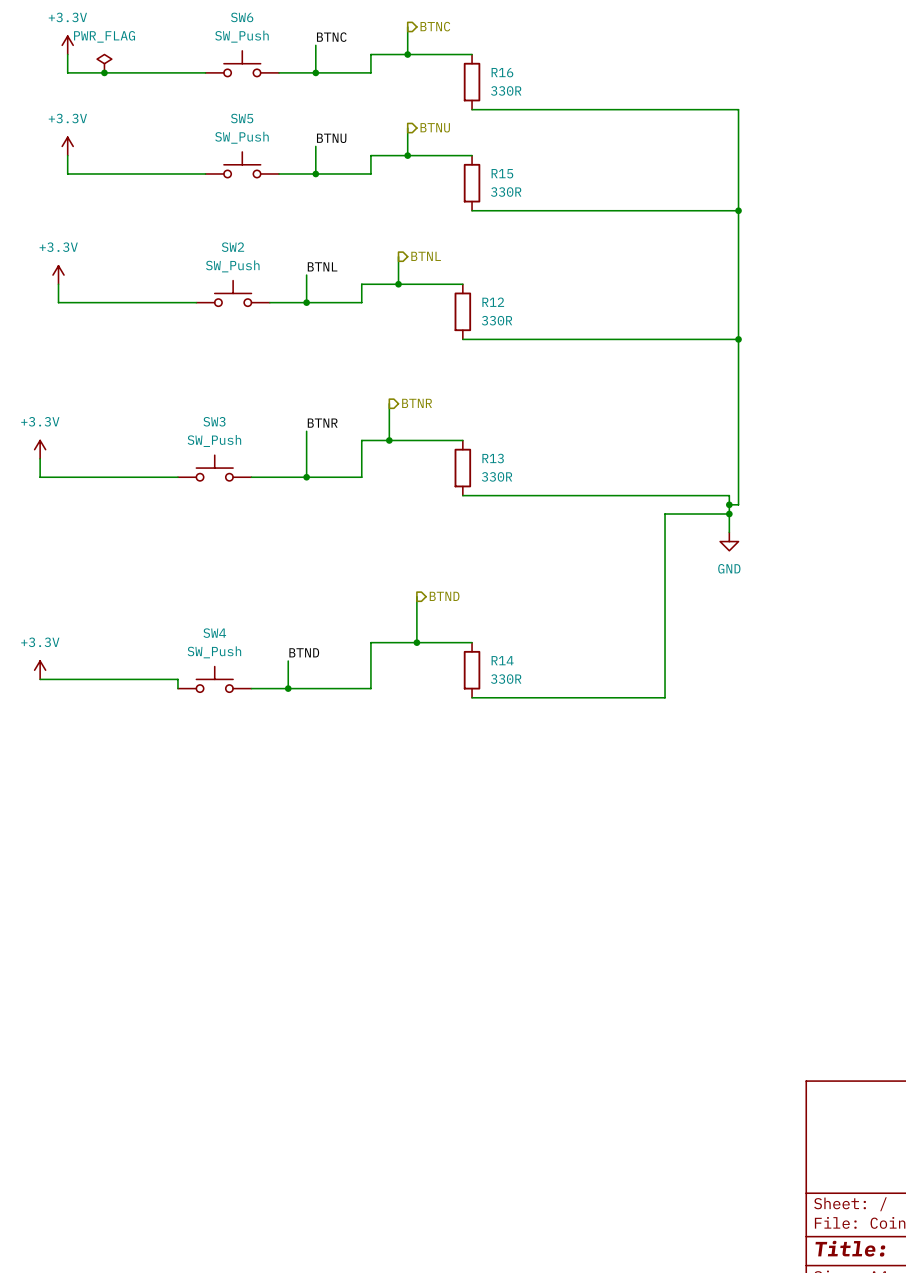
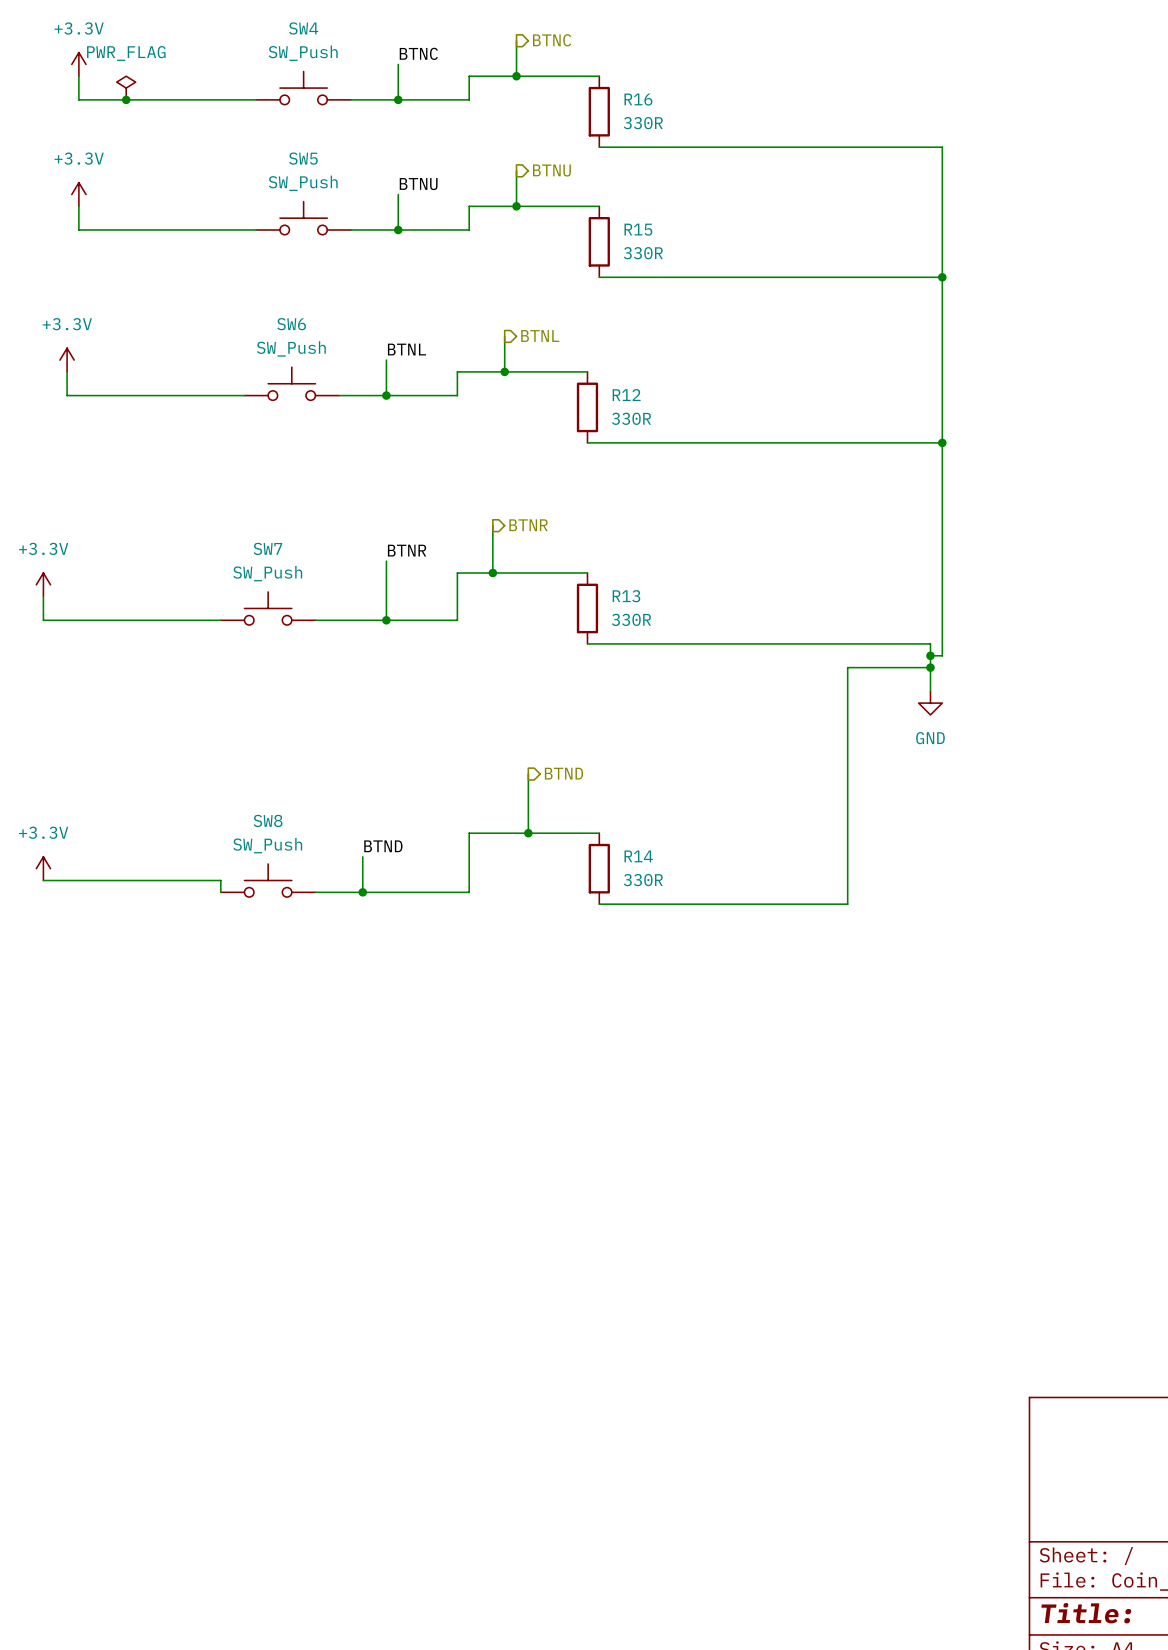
SW6 name: SW6 (242, 17) -> SW4 (303, 28)
SW2 name: SW2 (232, 247) -> SW6 (291, 324)
SW3 name: SW3 (214, 421) -> SW7 (267, 548)
SW4 name: SW4 (214, 633) -> SW8 (268, 820)

